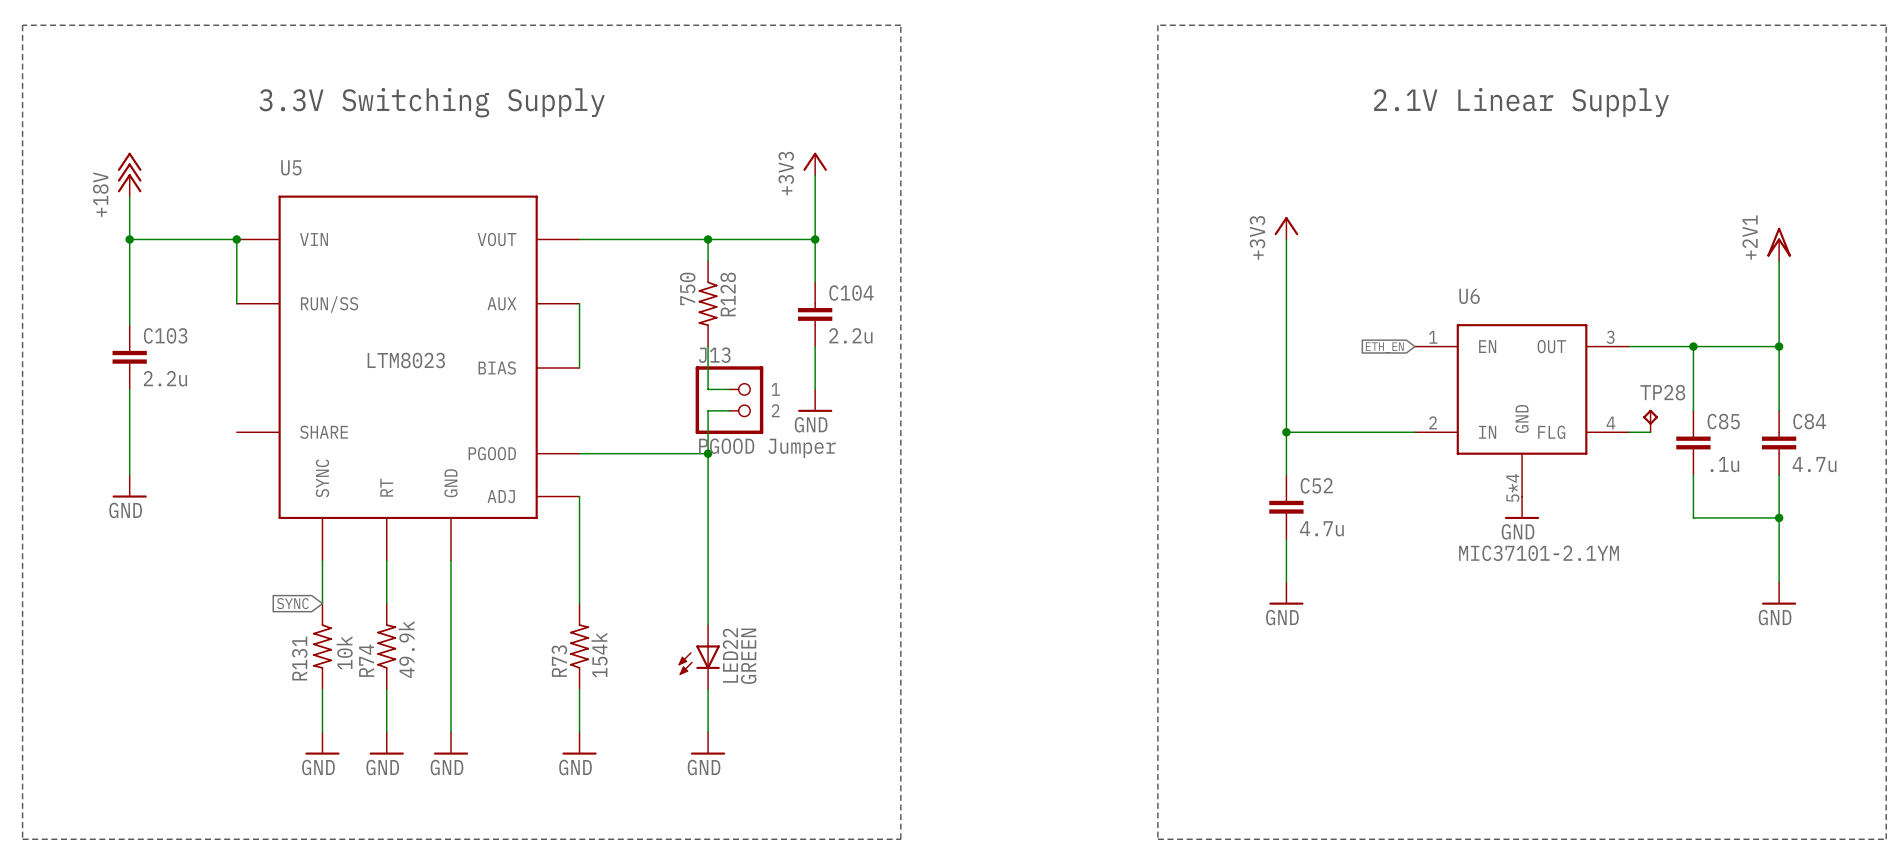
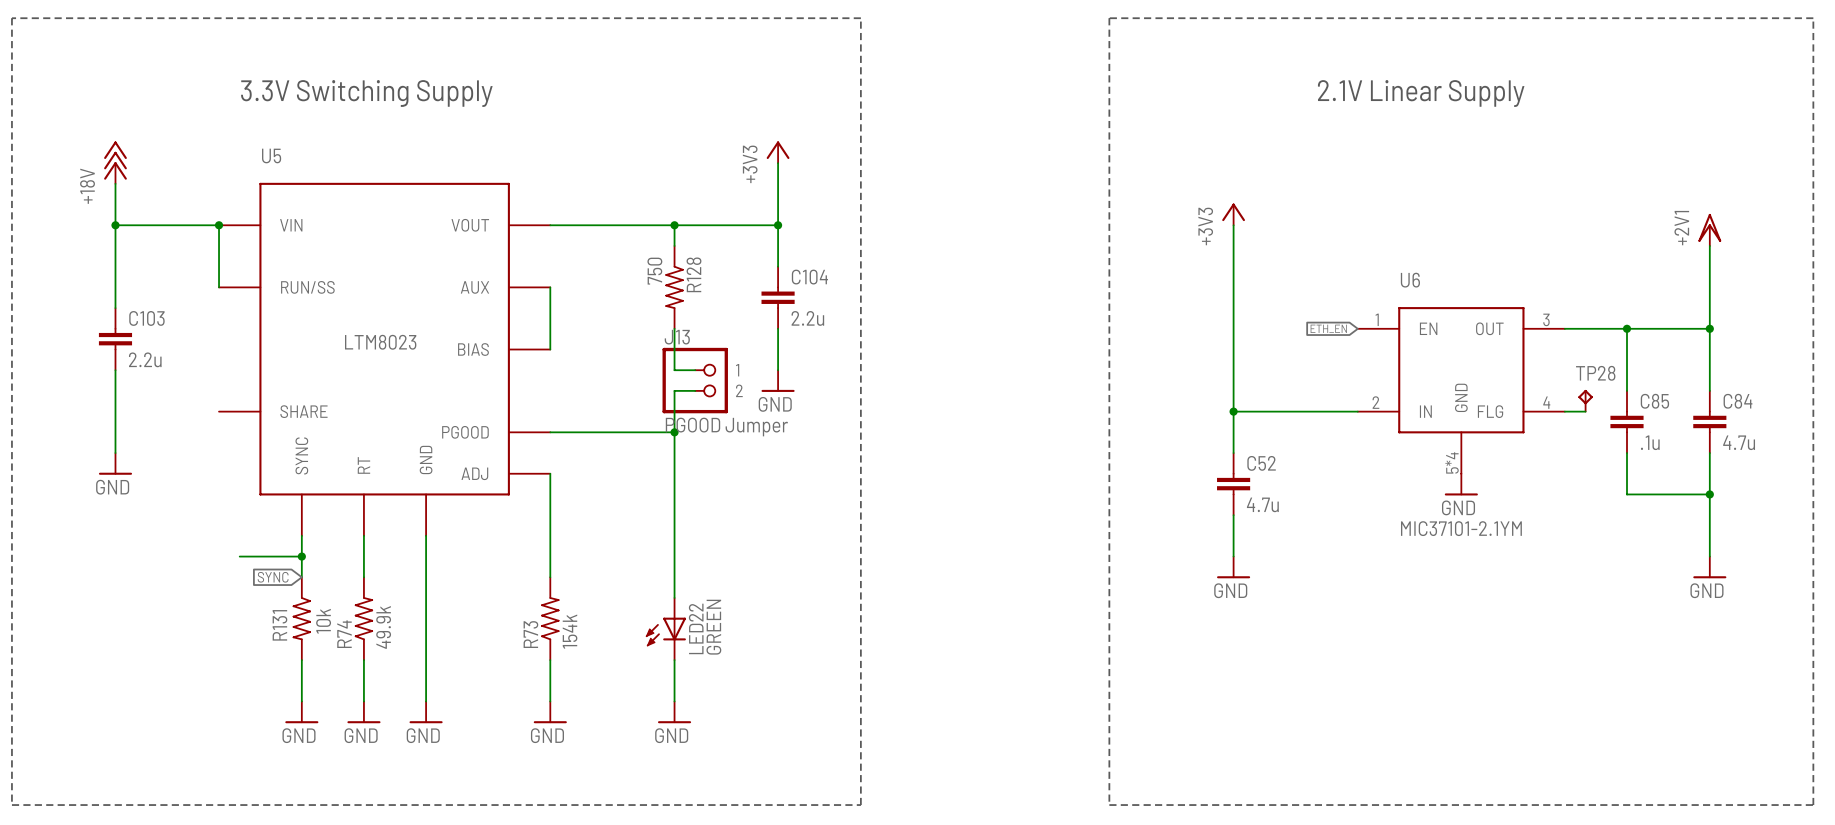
wire: none -> (239, 556) (301, 556)
junction: none -> (301, 556)

